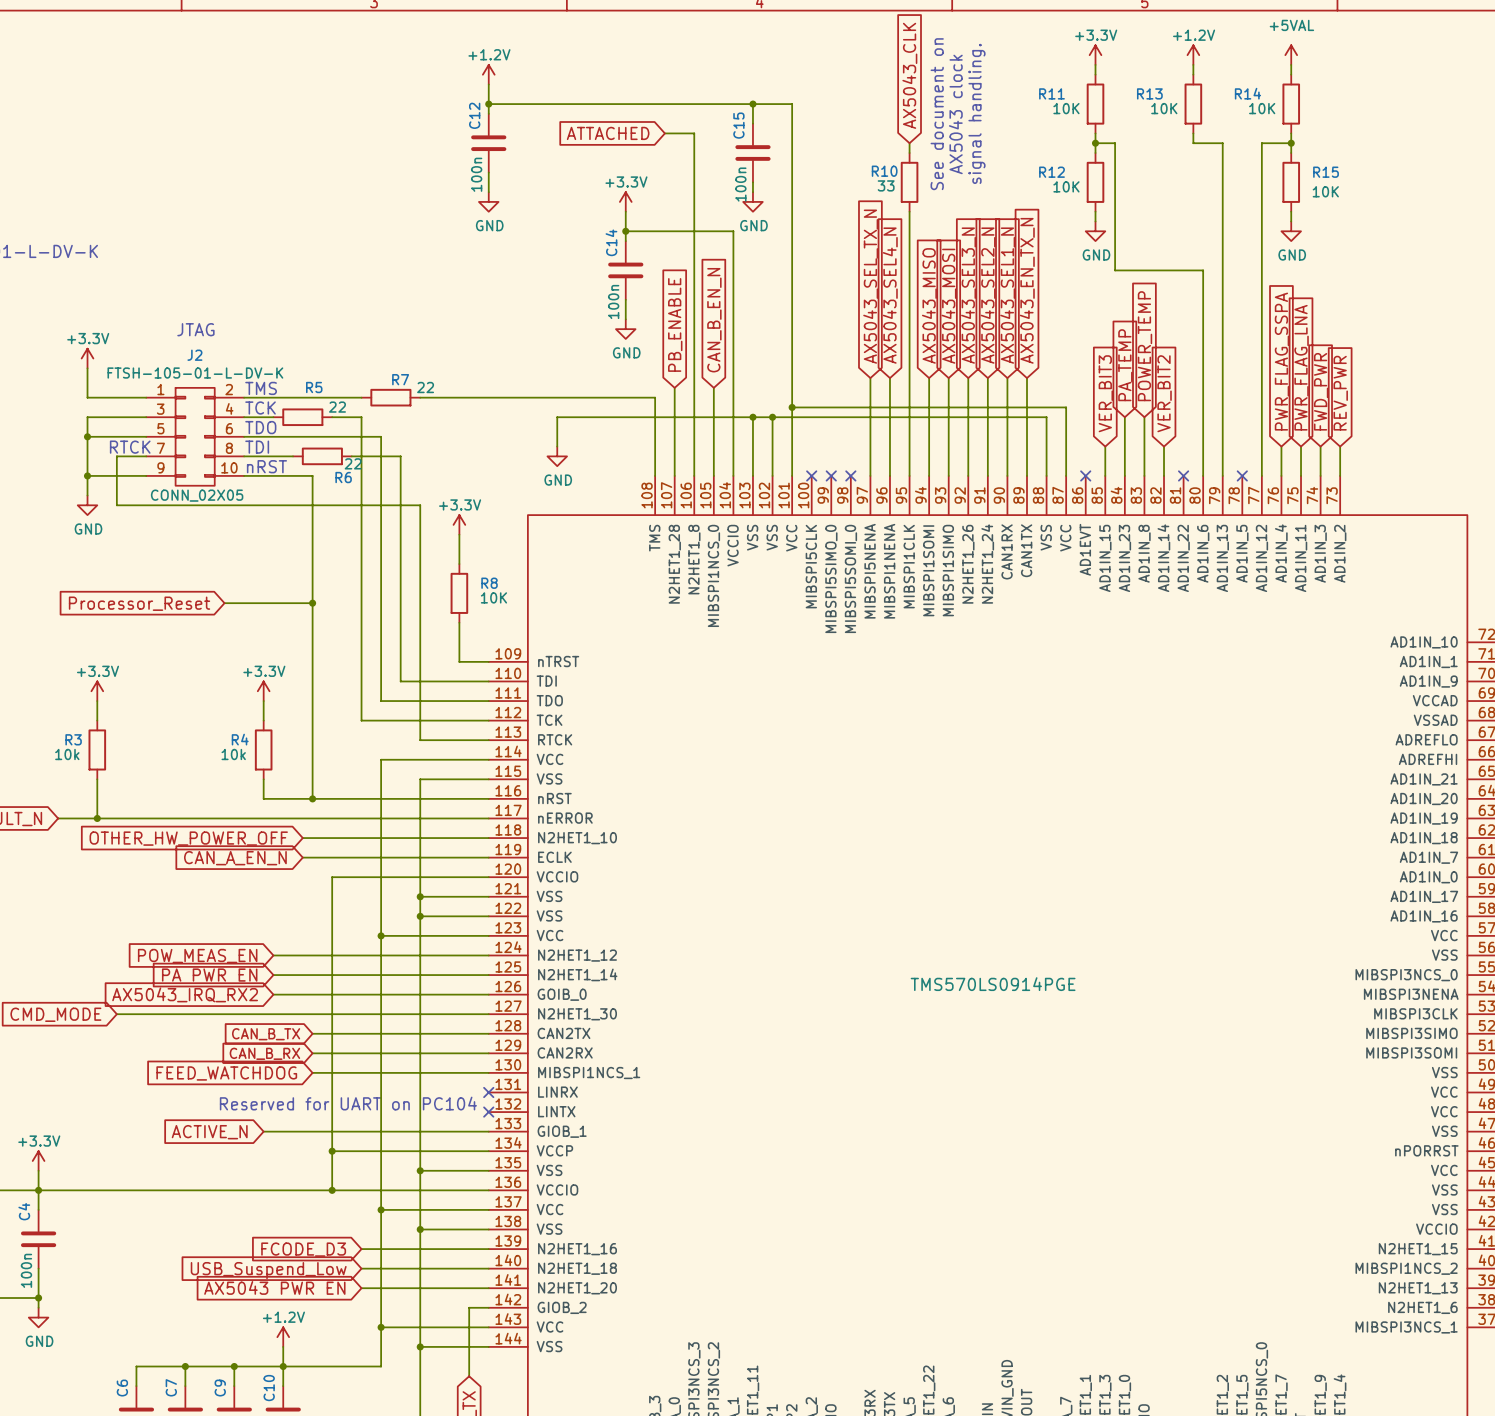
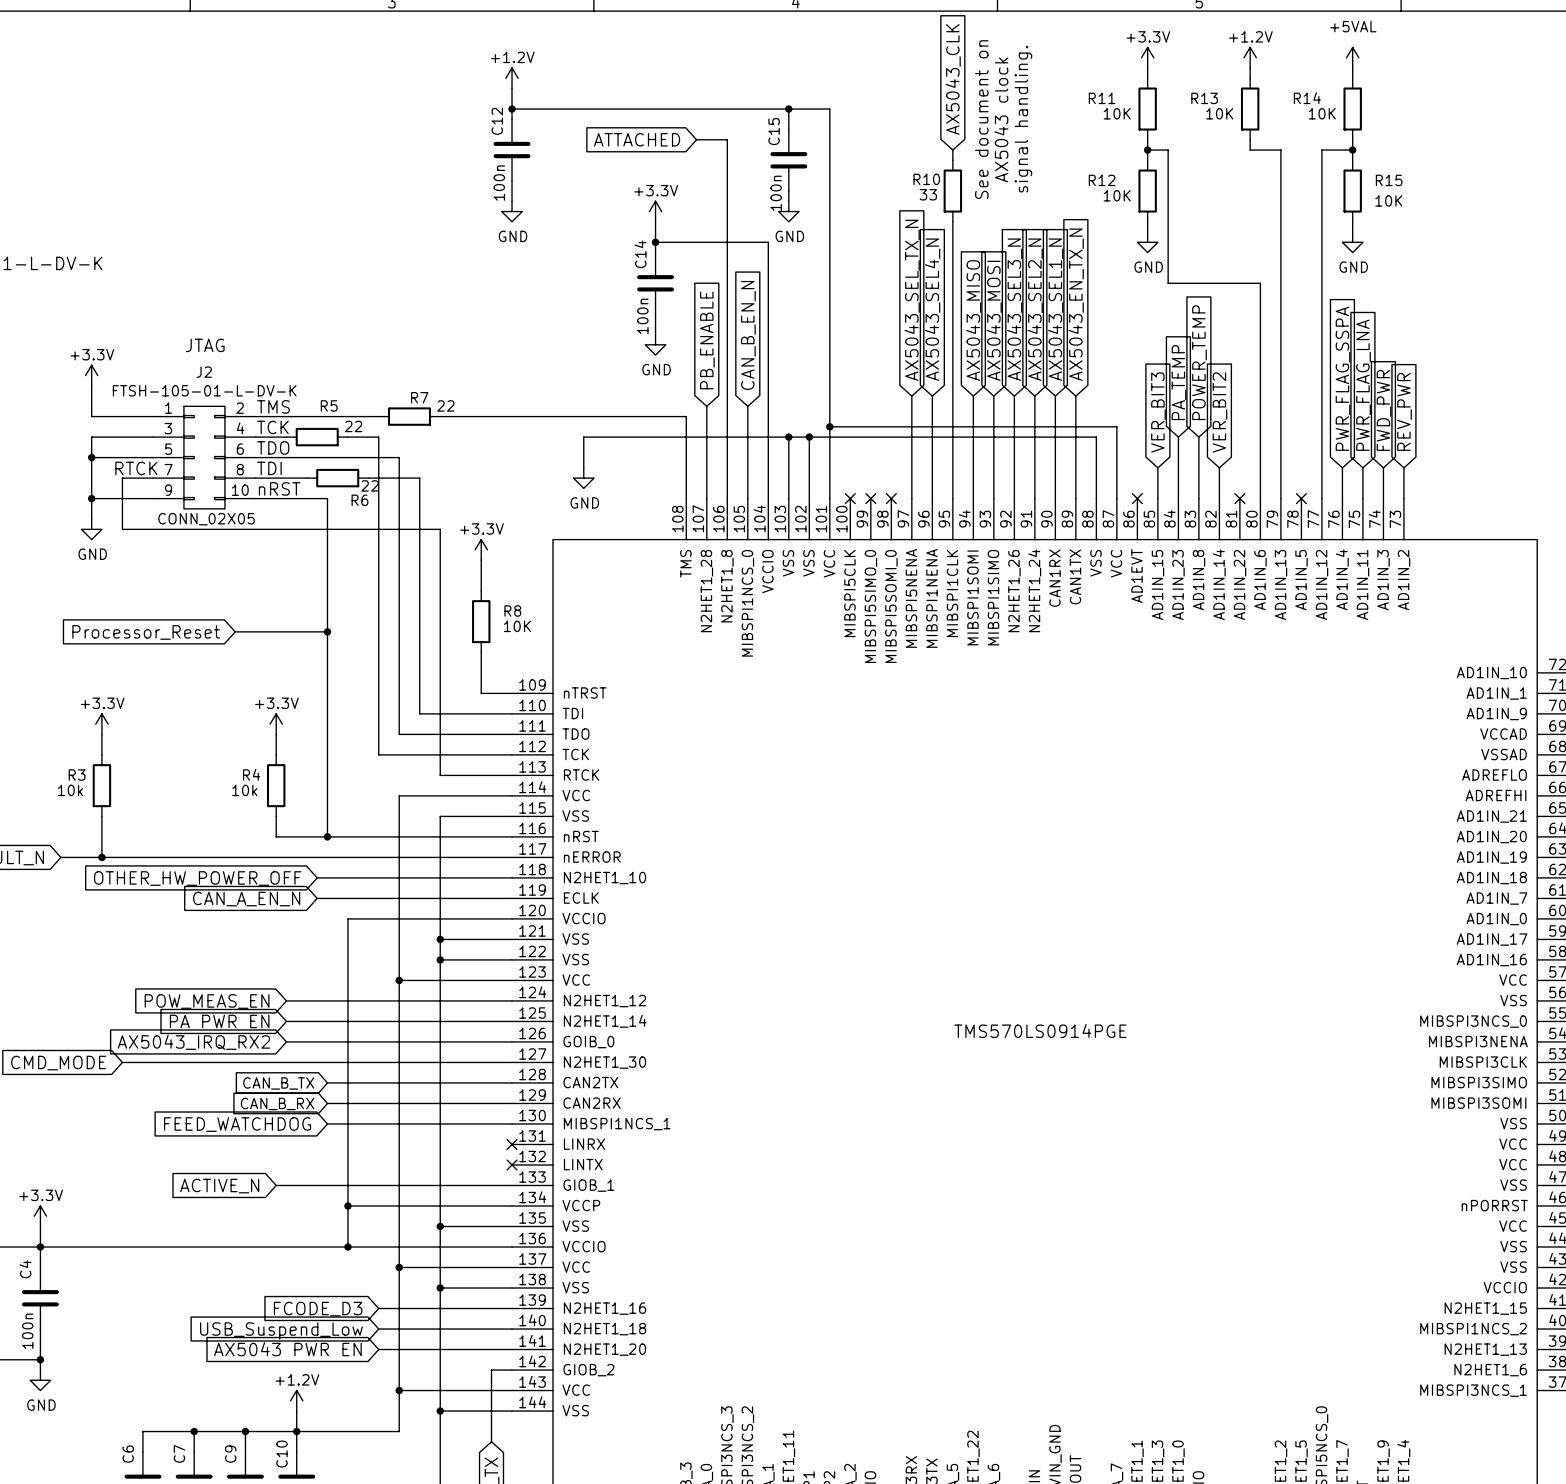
text: Reserved for UART on PC104 (348, 1103) -> none

